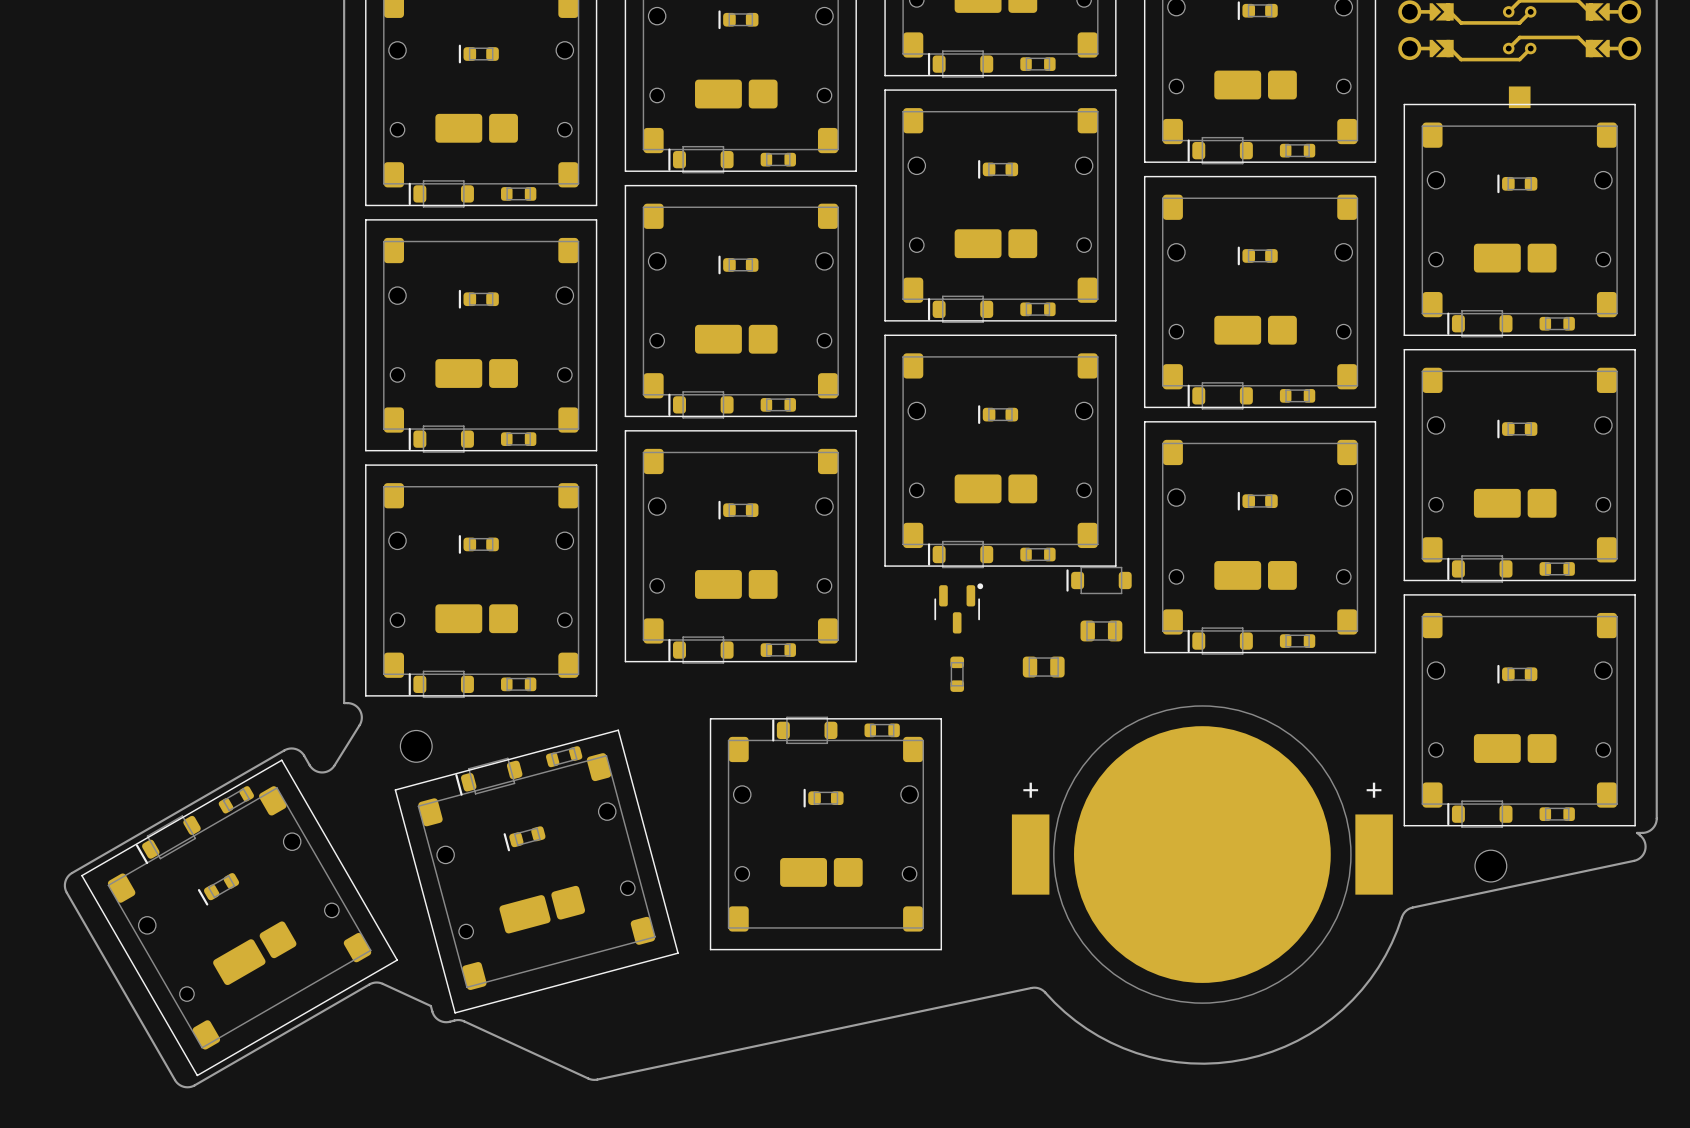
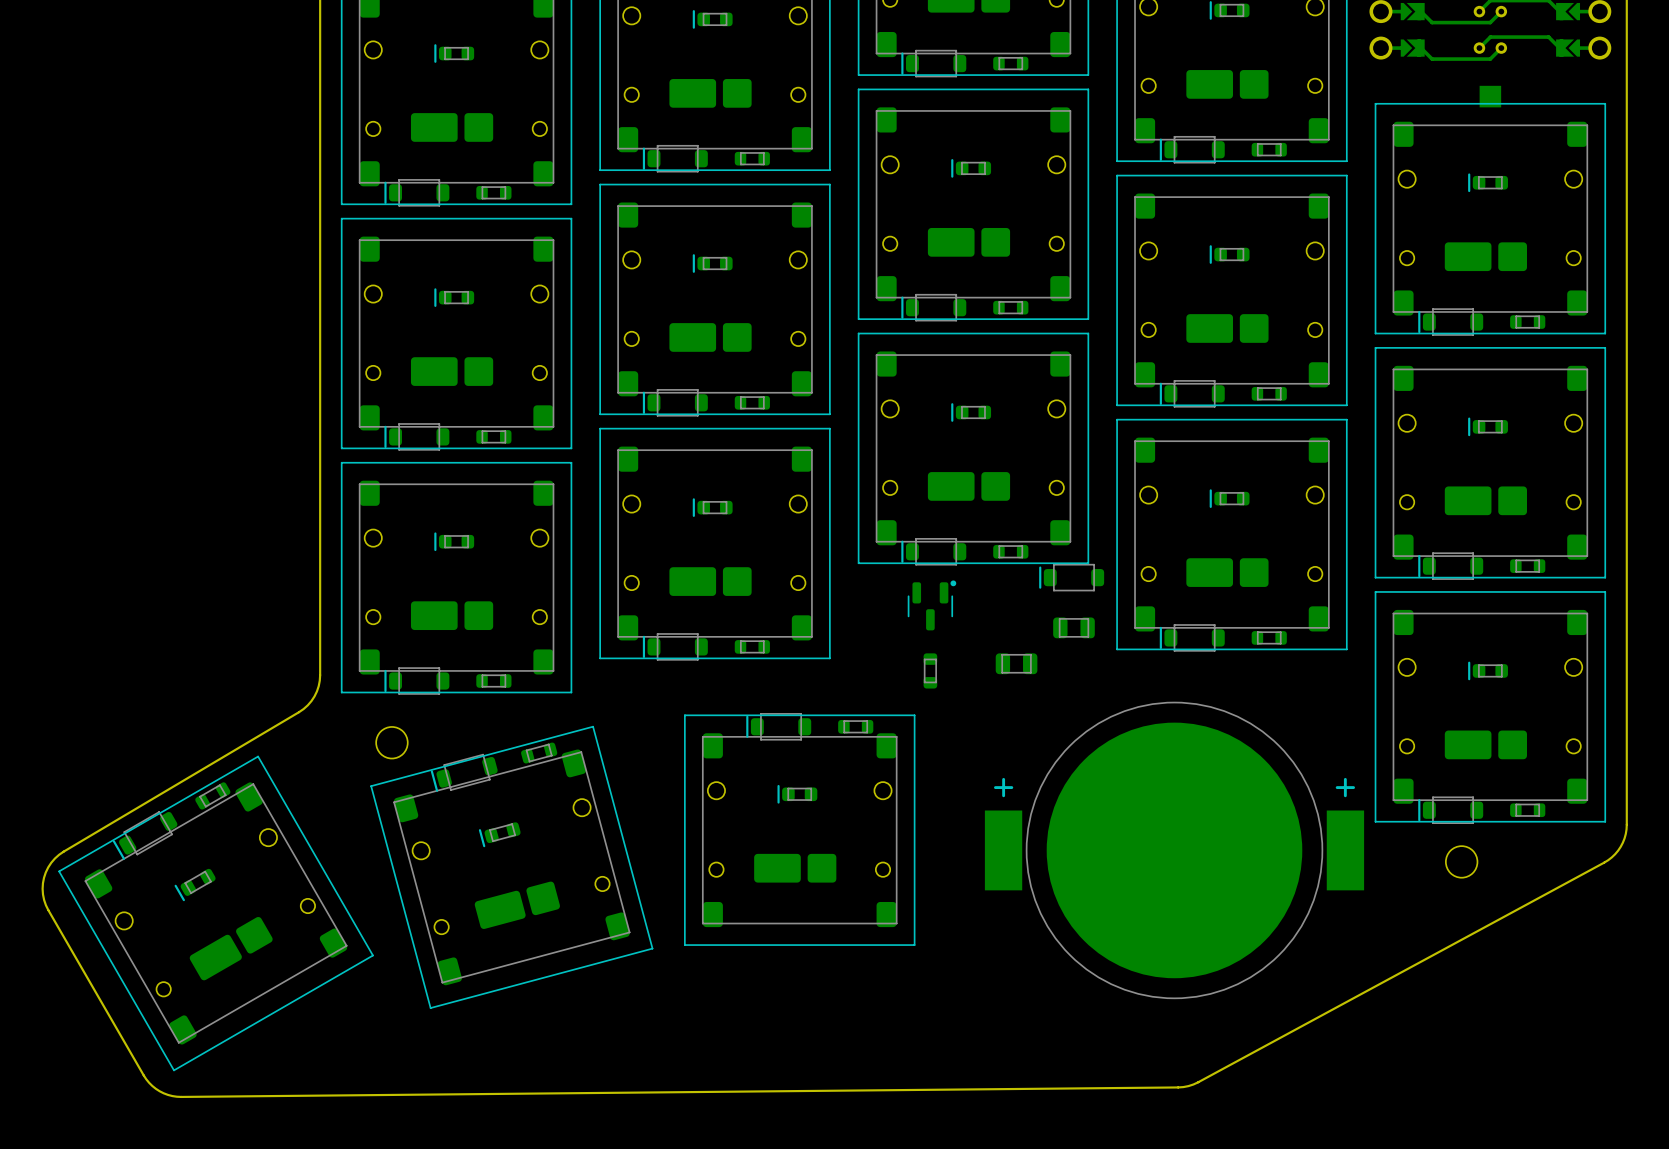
board edge: (344, 678) (344, 703) (352, 703) (358, 707) (361, 713) (361, 720) (330, 769) (323, 772) (316, 771) (310, 766) (300, 751) (293, 748) (286, 749) (72, 872) (65, 880) (66, 892) (174, 1080) (181, 1086) (194, 1085) (369, 984) (376, 982) (430, 1006) (433, 1015) (440, 1021) (462, 1020) (592, 1079) (1034, 987) (1043, 990) (1064, 1012) (1086, 1028) (1110, 1042) (1136, 1053) (1163, 1059) (1190, 1063) (1218, 1063) (1245, 1059) (1272, 1051) (1297, 1040) (1321, 1026) (1342, 1009) (1362, 989) (1378, 967) (1391, 943) (1403, 914) (1408, 909) (1635, 860) (1642, 854) (1645, 846) (1643, 839) (1637, 832) (1651, 829) (1656, 818) -> (320, 675) (316, 691) (303, 709) (63, 851) (54, 858) (45, 872) (42, 888) (48, 910) (143, 1075) (155, 1088) (168, 1094) (181, 1096) (1183, 1087) (1198, 1082) (1608, 860) (1622, 842) (1626, 829) (1626, 814)

